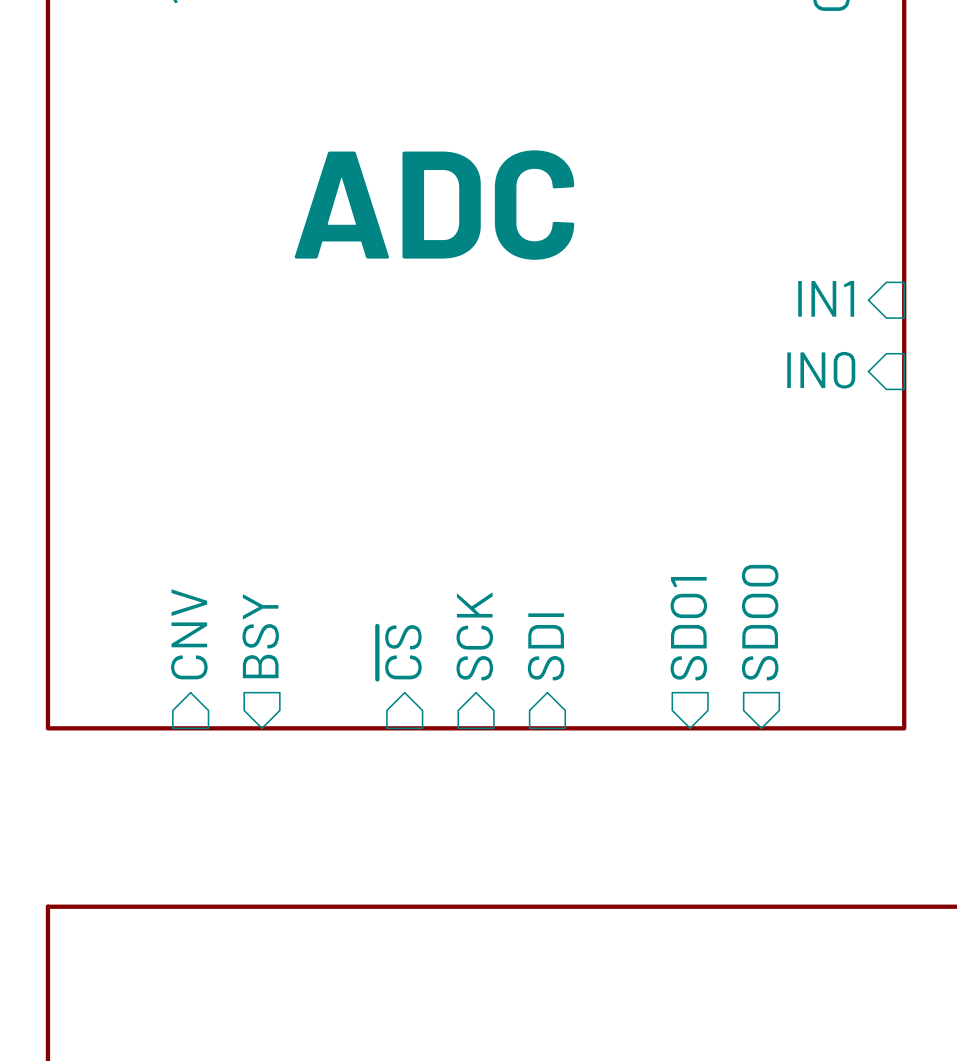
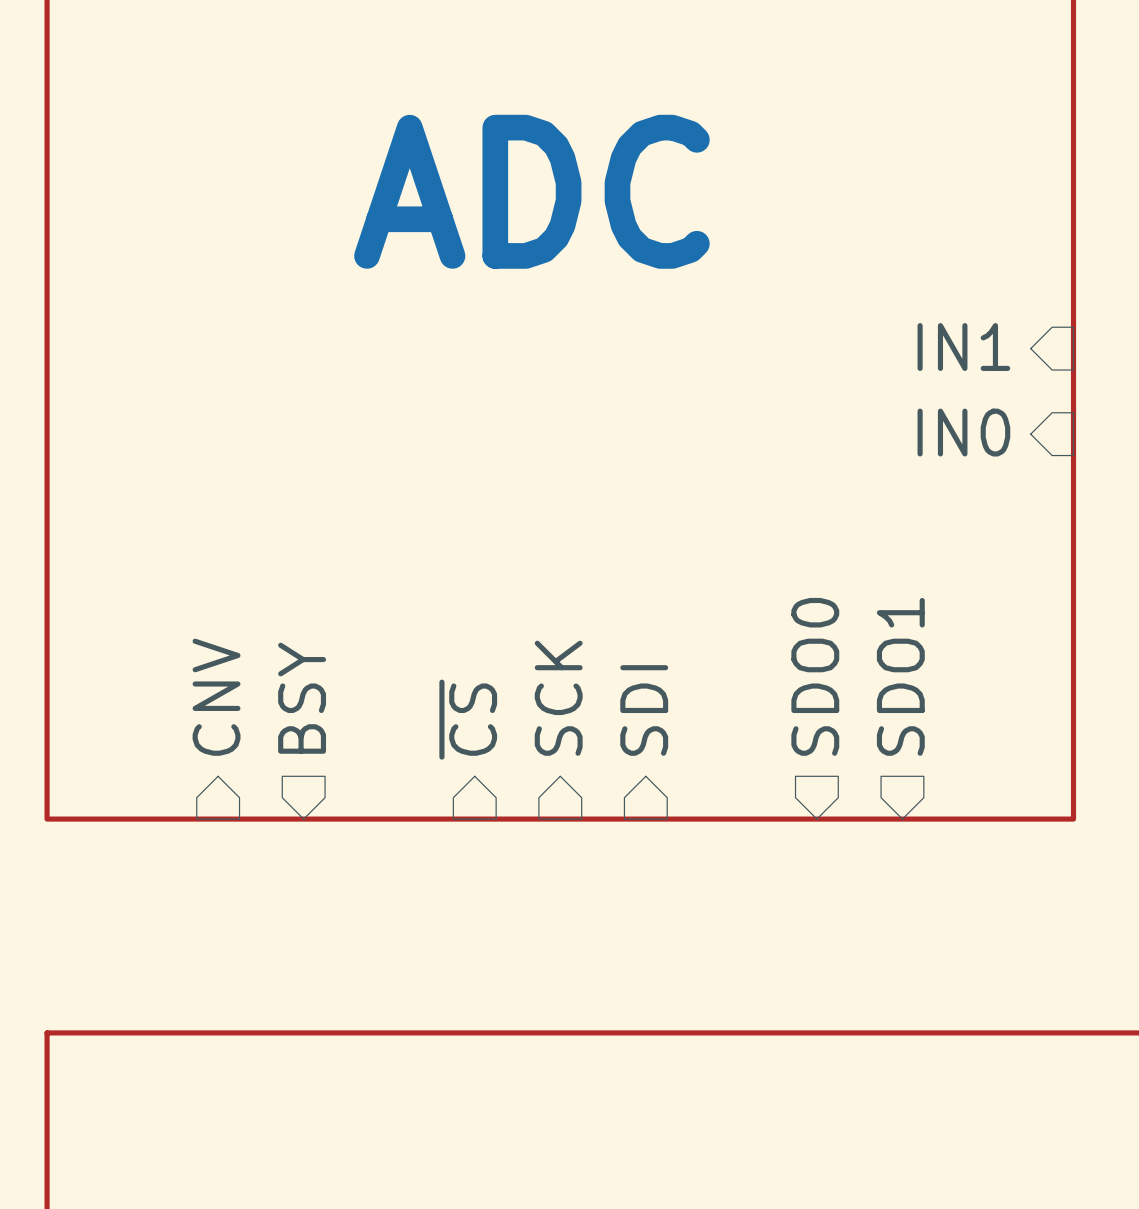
sheet pin position: IN1 (826, 298) -> IN1 (963, 347)
sheet pin position: IN0 (821, 370) -> IN0 (963, 432)
sheet pin: SDO0 (760, 622) -> SDO1 (900, 676)
sheet pin: SDO1 (688, 628) -> SDO0 (815, 676)

